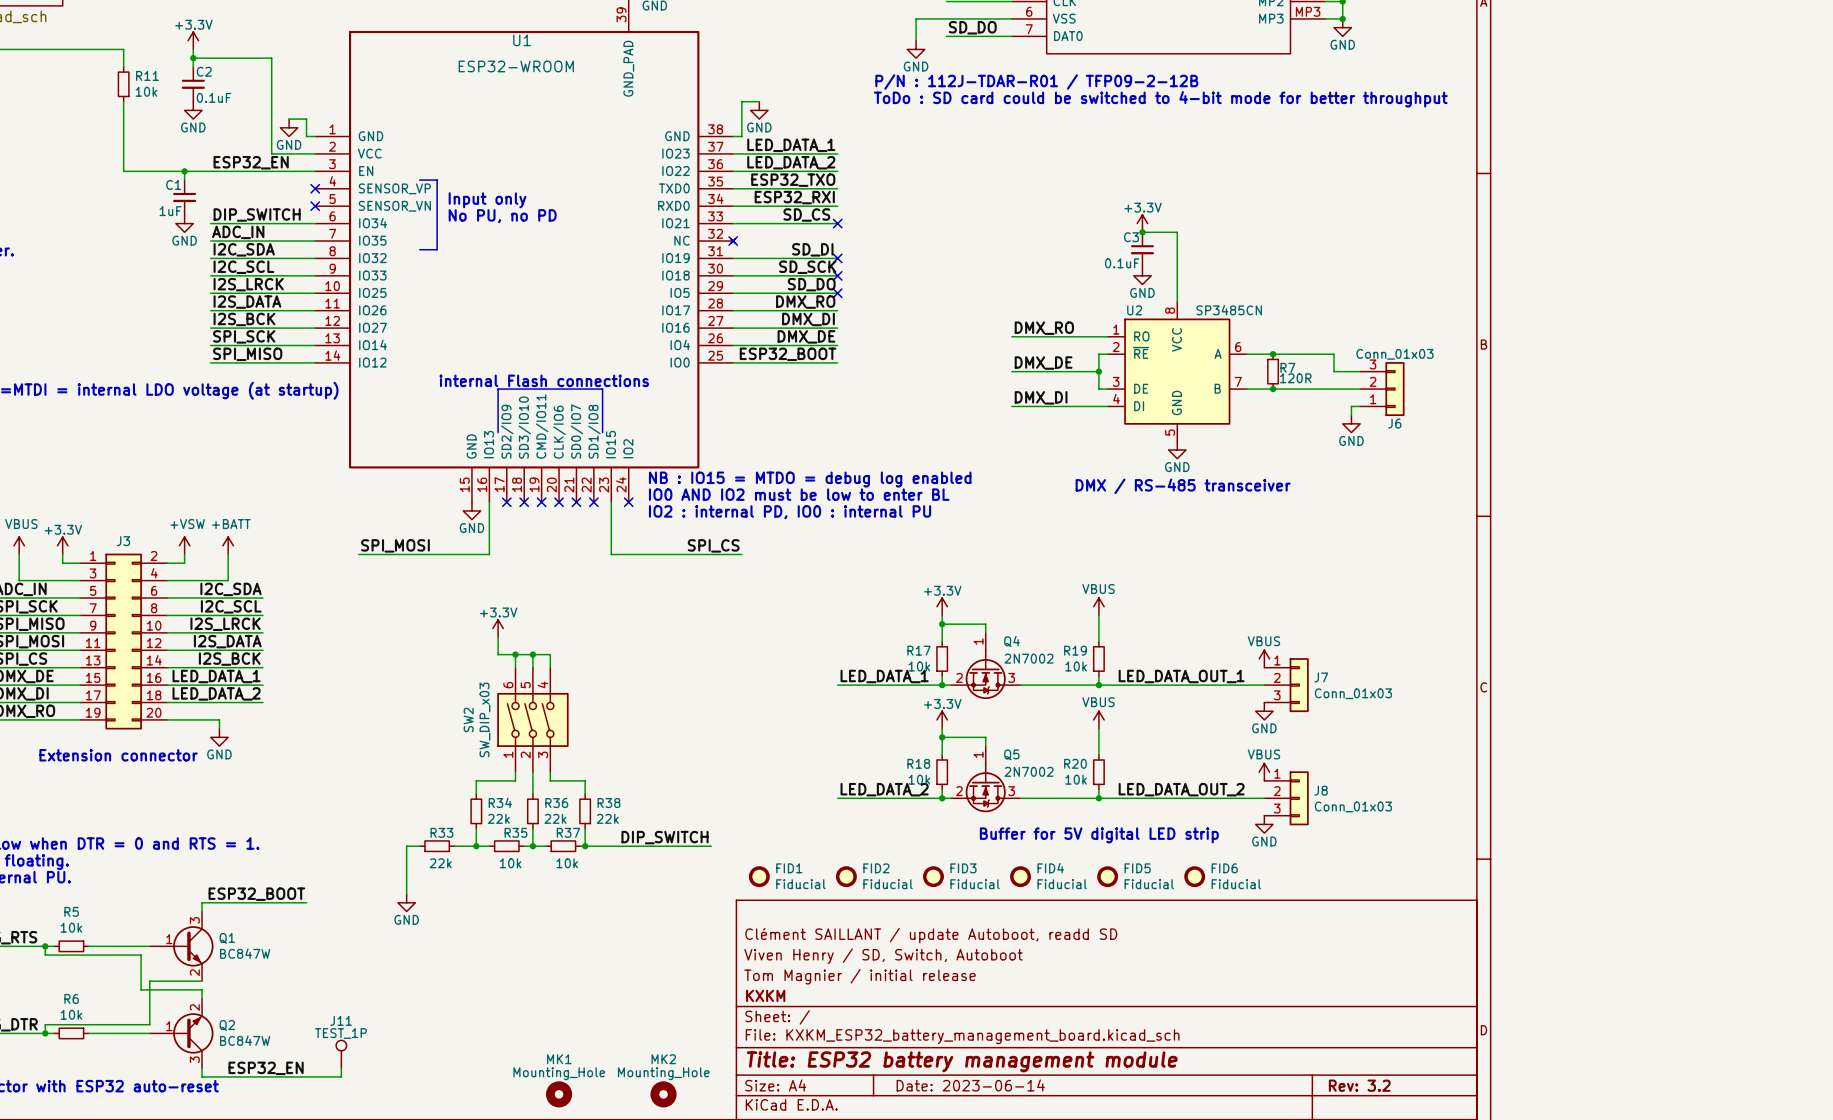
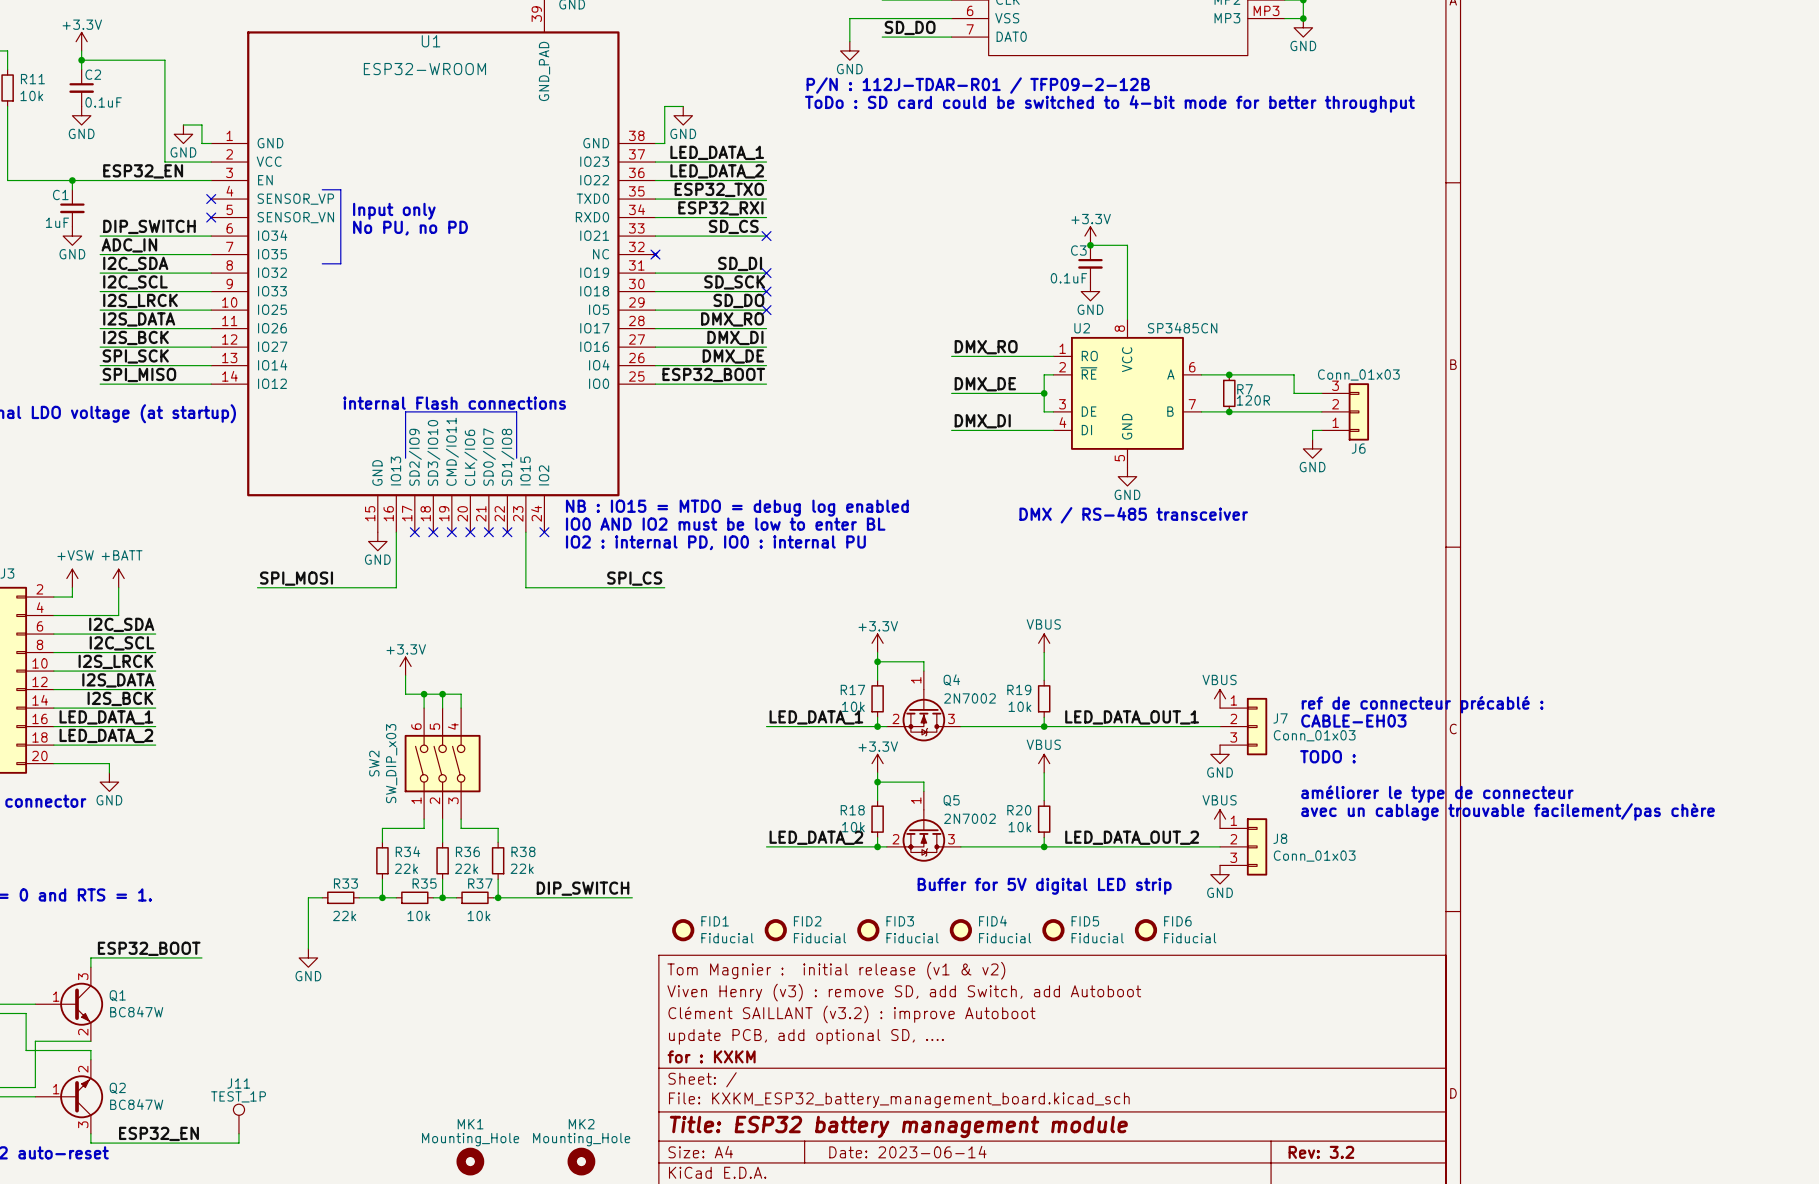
text: none -> ref de connecteur précablé : (1422, 704)
text: none -> CABLE-EH03 (1353, 720)
text: none -> TODO : (1327, 756)
text: none -> améliorer le type de connecteur (1437, 794)
text: none -> avec un cablage trouvable facilement/pas chère (1508, 811)
title block: none -> Tom Magnier : initial release (v1 & v2) (836, 970)
title block: Clément SAILLANT / update Autoboot, readd SD (931, 935) -> Viven Henry (v3) : remove SD, add Switch, add Autoboot (904, 992)
title block: Viven Henry / SD, Switch, Autoboot (883, 956) -> Clément SAILLANT (v3.2) : improve Autoboot (851, 1014)
title block: Tom Magnier / initial release (860, 976) -> update PCB, add optional SD, .... (806, 1036)
title block: KXKM (765, 995) -> for : KXKM (711, 1056)

